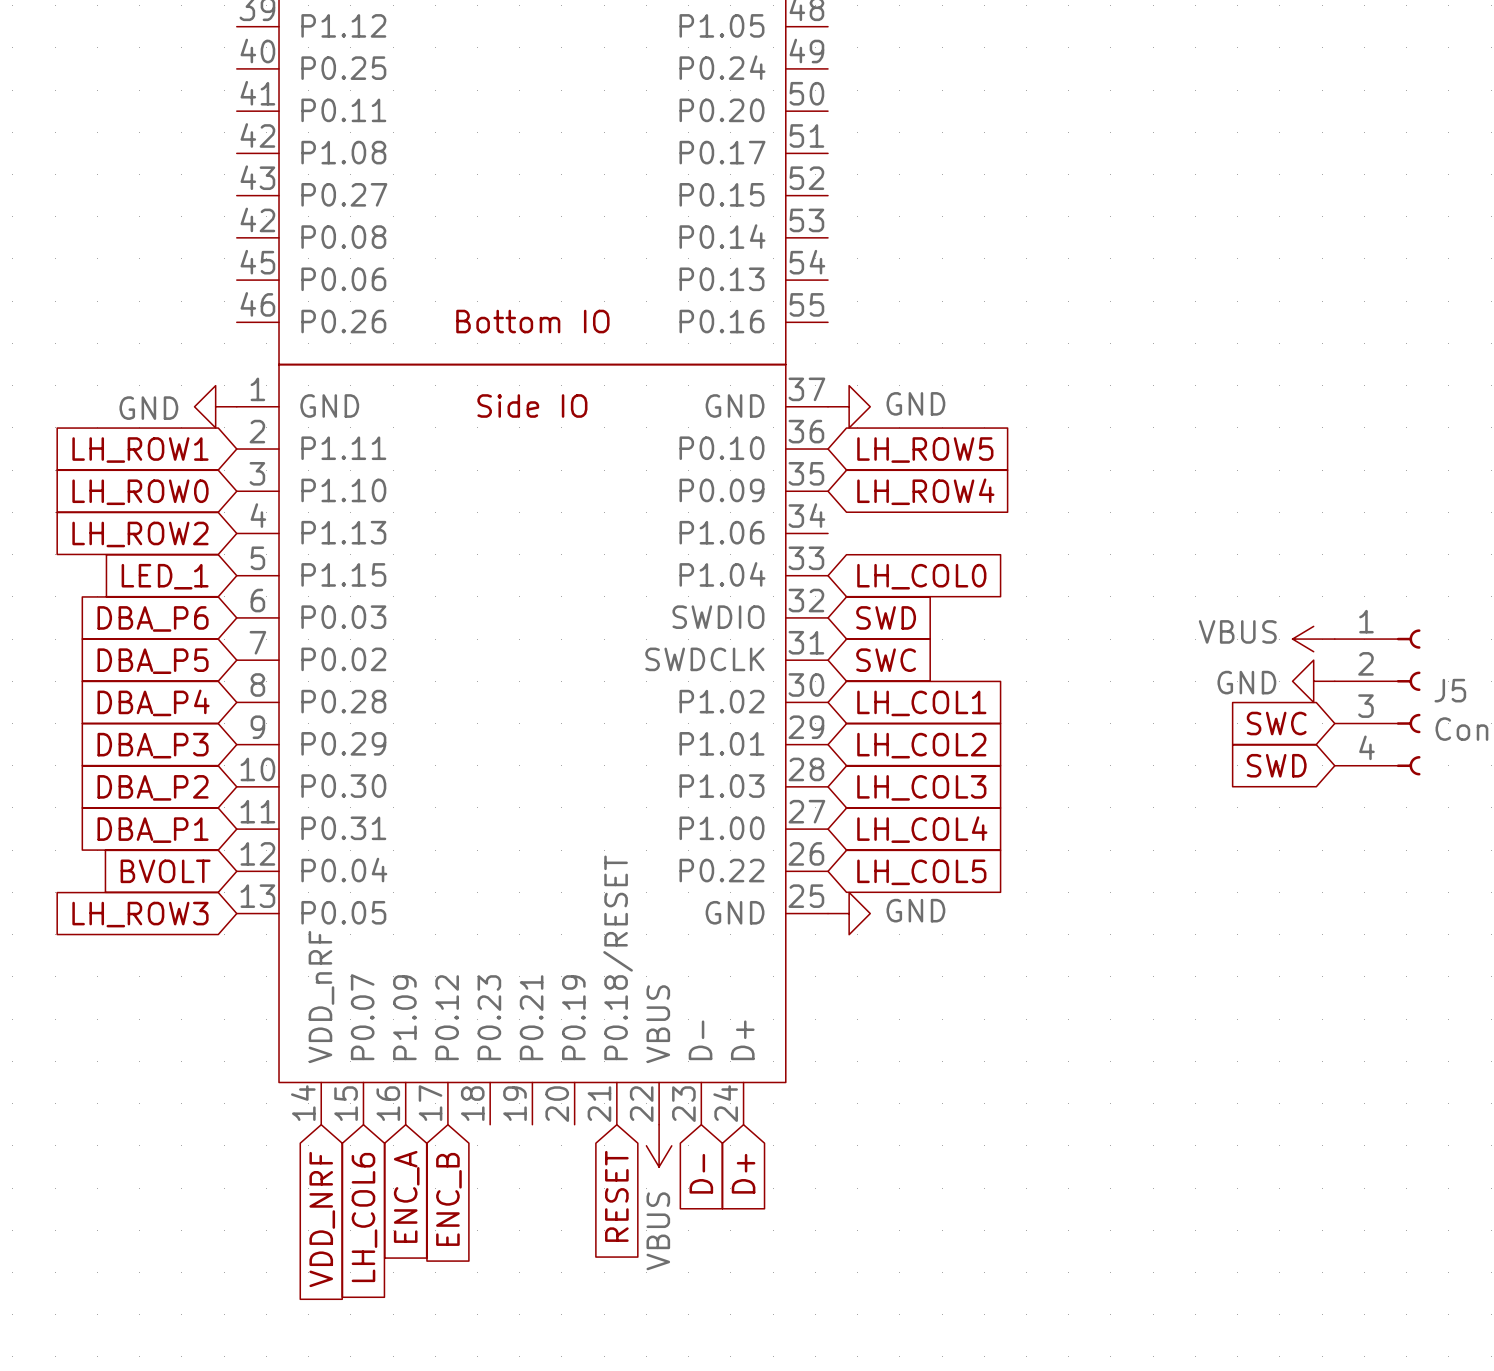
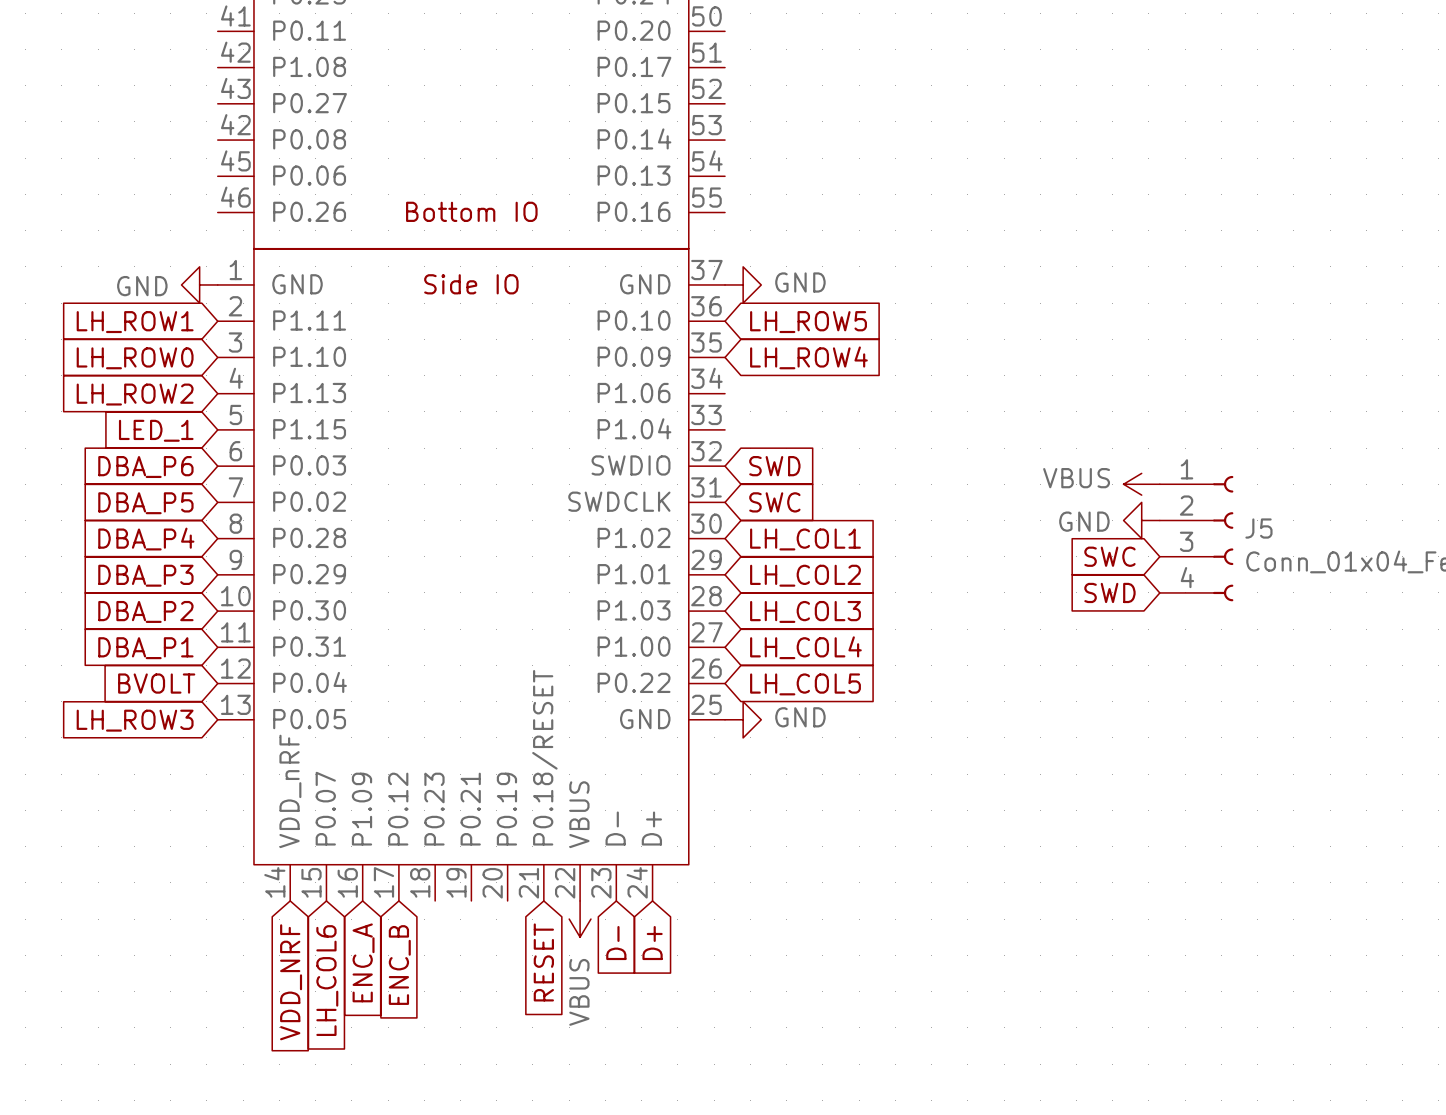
global label: LH_COL0 (921, 576) -> none

